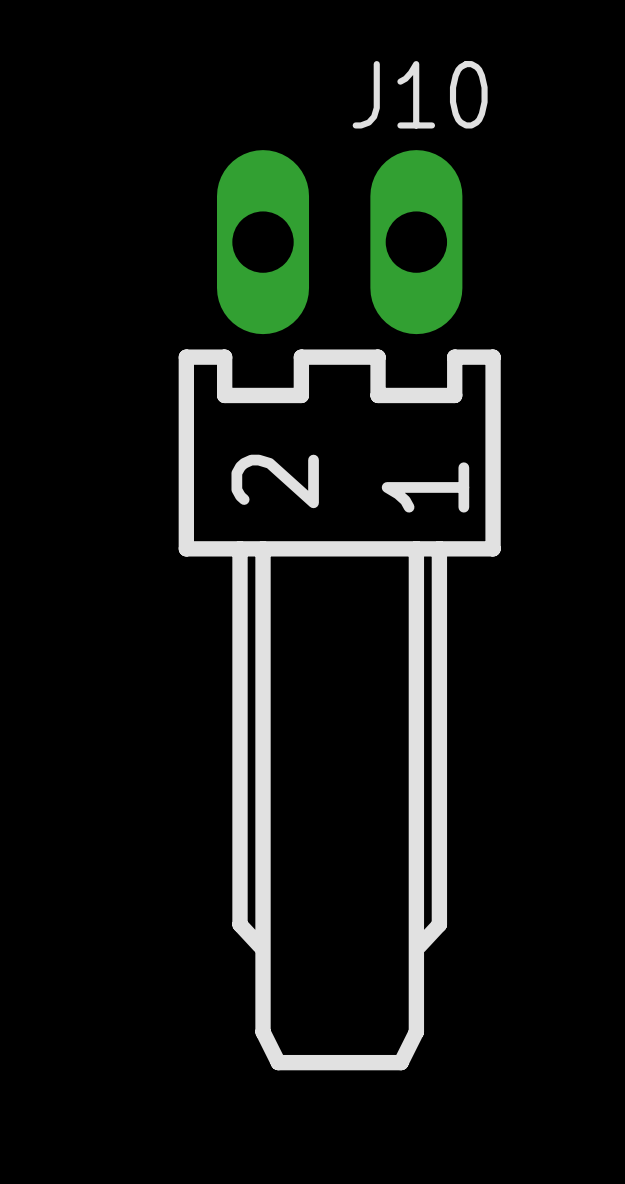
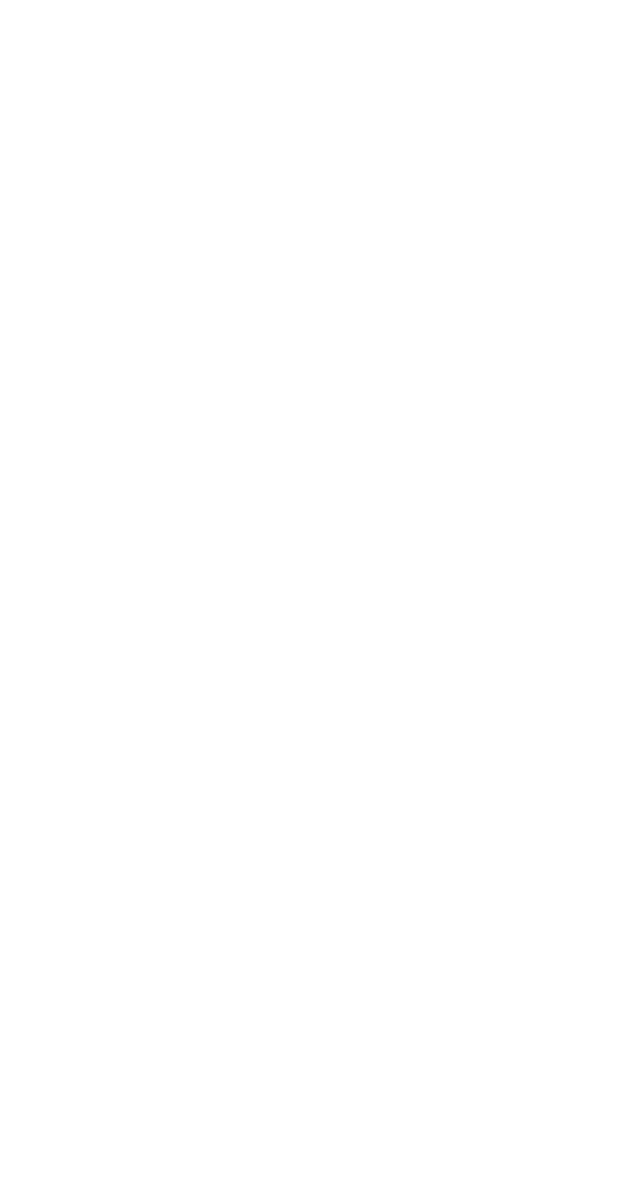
J10: (339, 610) -> none

